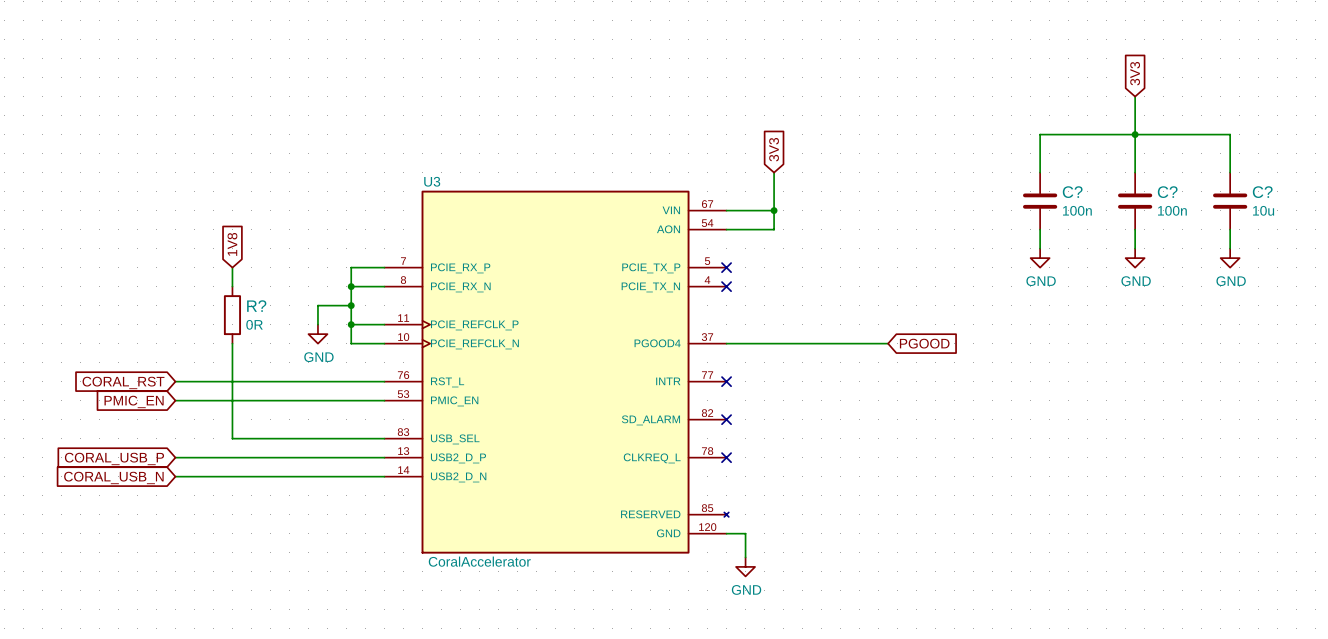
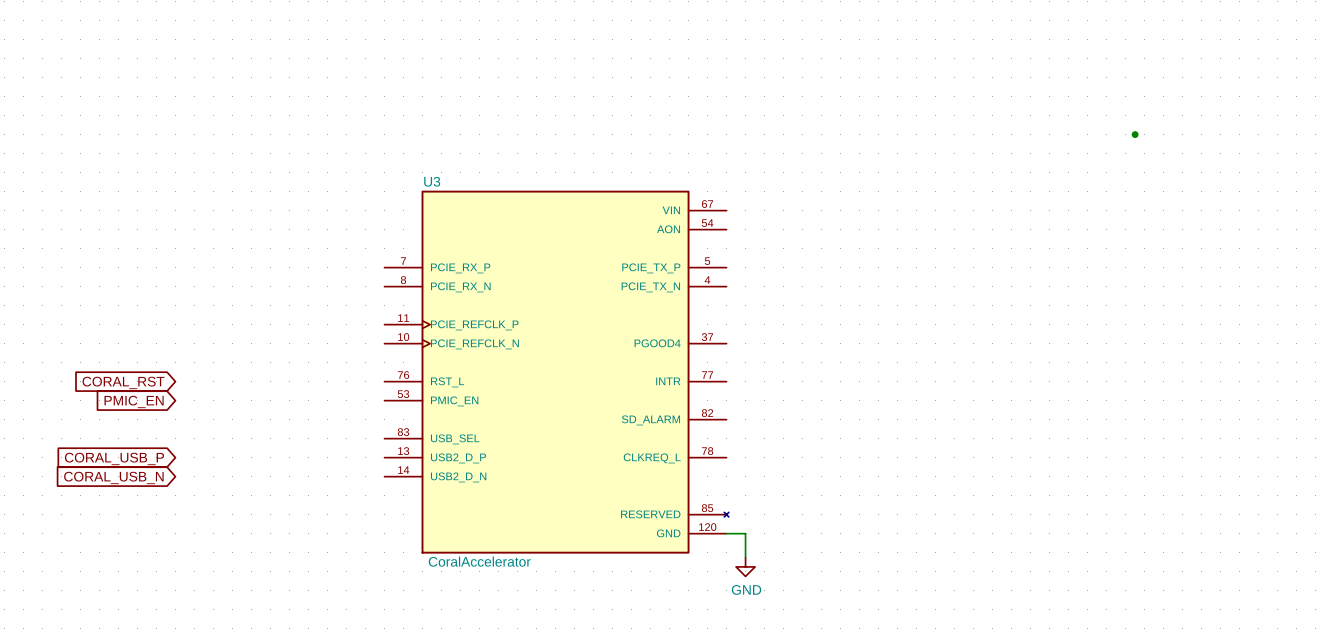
global label: 3V3 (1135, 73) -> none
wire: (1135, 96) (1135, 172) -> none
global label: 3V3 (774, 149) -> none
wire: (774, 172) (774, 229) (726, 229) -> none
wire: (1040, 172) (1040, 134) (1230, 134) (1230, 172) -> none
C?: (1040, 201) -> none
C?: (1135, 201) -> none
C?: (1230, 201) -> none
wire: (726, 210) (774, 210) -> none
junction: (774, 210) -> none
wire: (1040, 229) (1040, 248) -> none
wire: (1135, 229) (1135, 248) -> none
wire: (1230, 229) (1230, 248) -> none
global label: 1V8 (232, 244) -> none
power symbol: GND (1040, 258) -> none
power symbol: GND (1135, 258) -> none
power symbol: GND (1230, 258) -> none
wire: (232, 267) (232, 286) -> none
wire: (384, 267) (351, 267) (351, 343) (384, 343) -> none
no-connect mark: (726, 267) -> none
wire: (351, 286) (384, 286) -> none
junction: (351, 286) -> none
no-connect mark: (726, 286) -> none
wire: (351, 305) (317, 305) (317, 324) -> none
junction: (351, 305) -> none
R?: (232, 315) -> none
wire: (351, 324) (384, 324) -> none
junction: (351, 324) -> none
power symbol: GND (317, 334) -> none
wire: (232, 343) (232, 438) (384, 438) -> none
wire: (726, 343) (888, 343) -> none
global label: PGOOD (924, 343) -> none
wire: (175, 381) (384, 381) -> none
no-connect mark: (726, 381) -> none
wire: (175, 400) (384, 400) -> none
no-connect mark: (726, 419) -> none
wire: (175, 457) (384, 457) -> none
no-connect mark: (726, 457) -> none
wire: (175, 476) (384, 476) -> none

